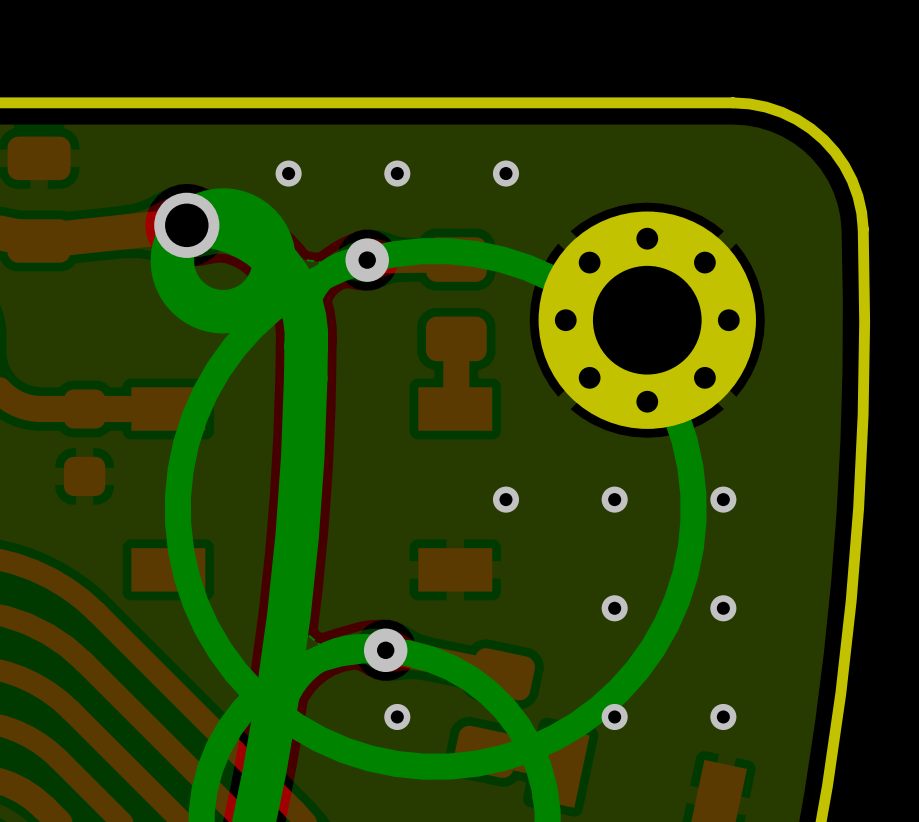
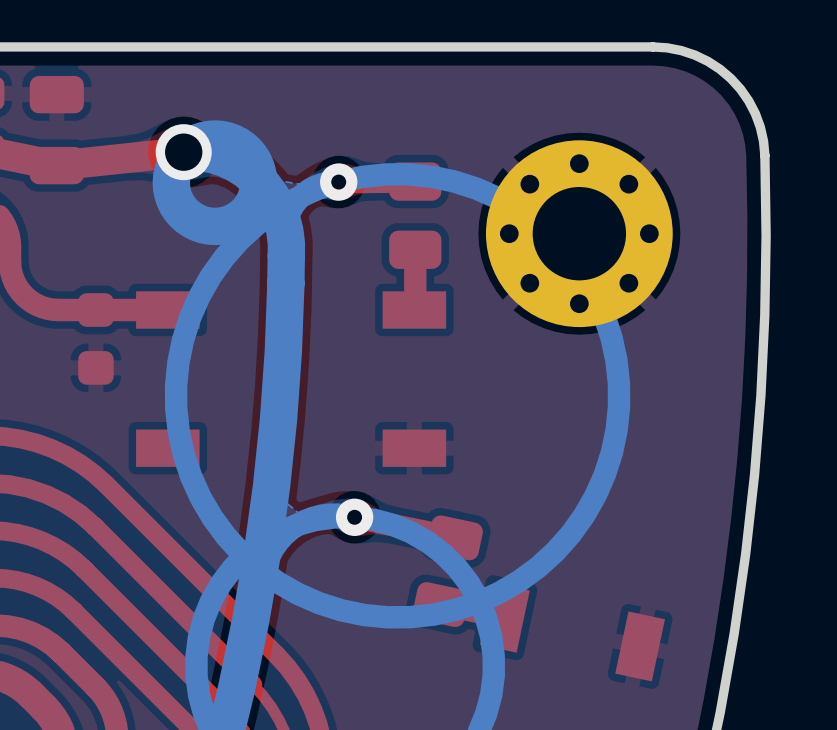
via: (288, 173) -> none
via: (397, 173) -> none
via: (505, 173) -> none
via: (505, 499) -> none
via: (614, 499) -> none
via: (723, 499) -> none
via: (614, 608) -> none
via: (723, 608) -> none
via: (397, 716) -> none
via: (614, 716) -> none
via: (723, 716) -> none

